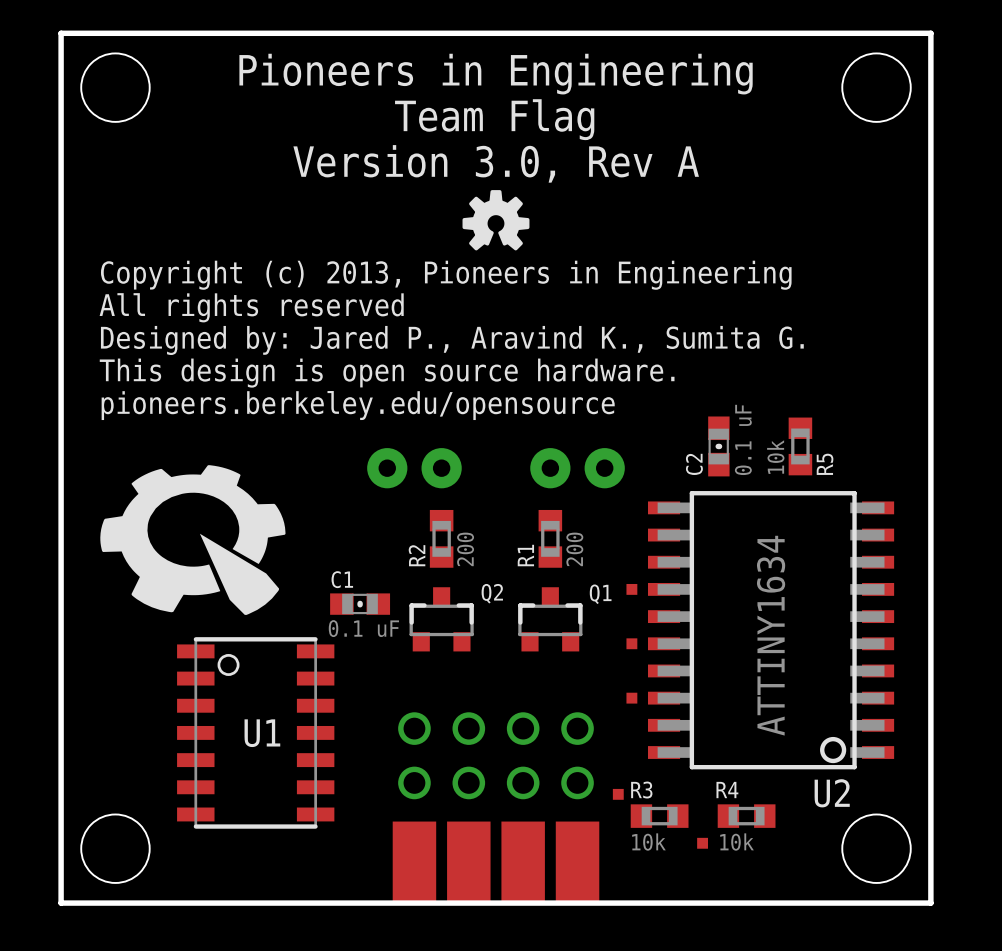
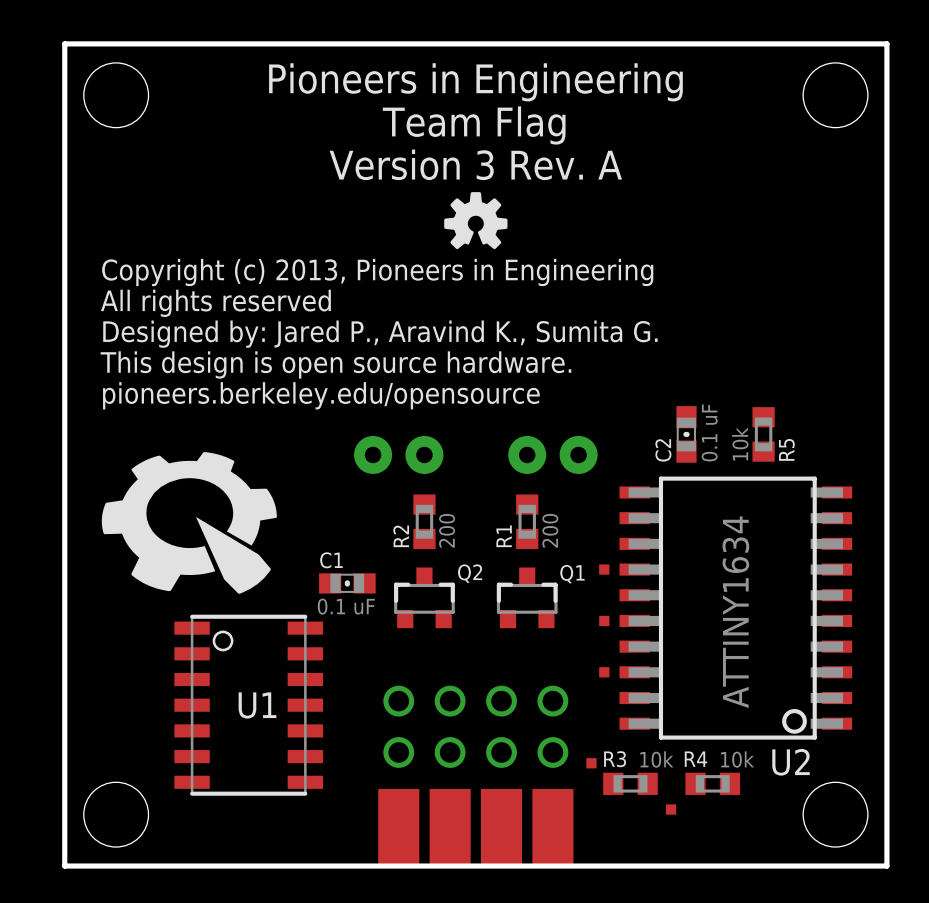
text: Version 3.0, Rev A (496, 163) -> Version 3 Rev. A (475, 164)
R3 value position: 10k (648, 842) -> 10k (656, 759)
R4 value position: 10k (737, 842) -> 10k (737, 759)

